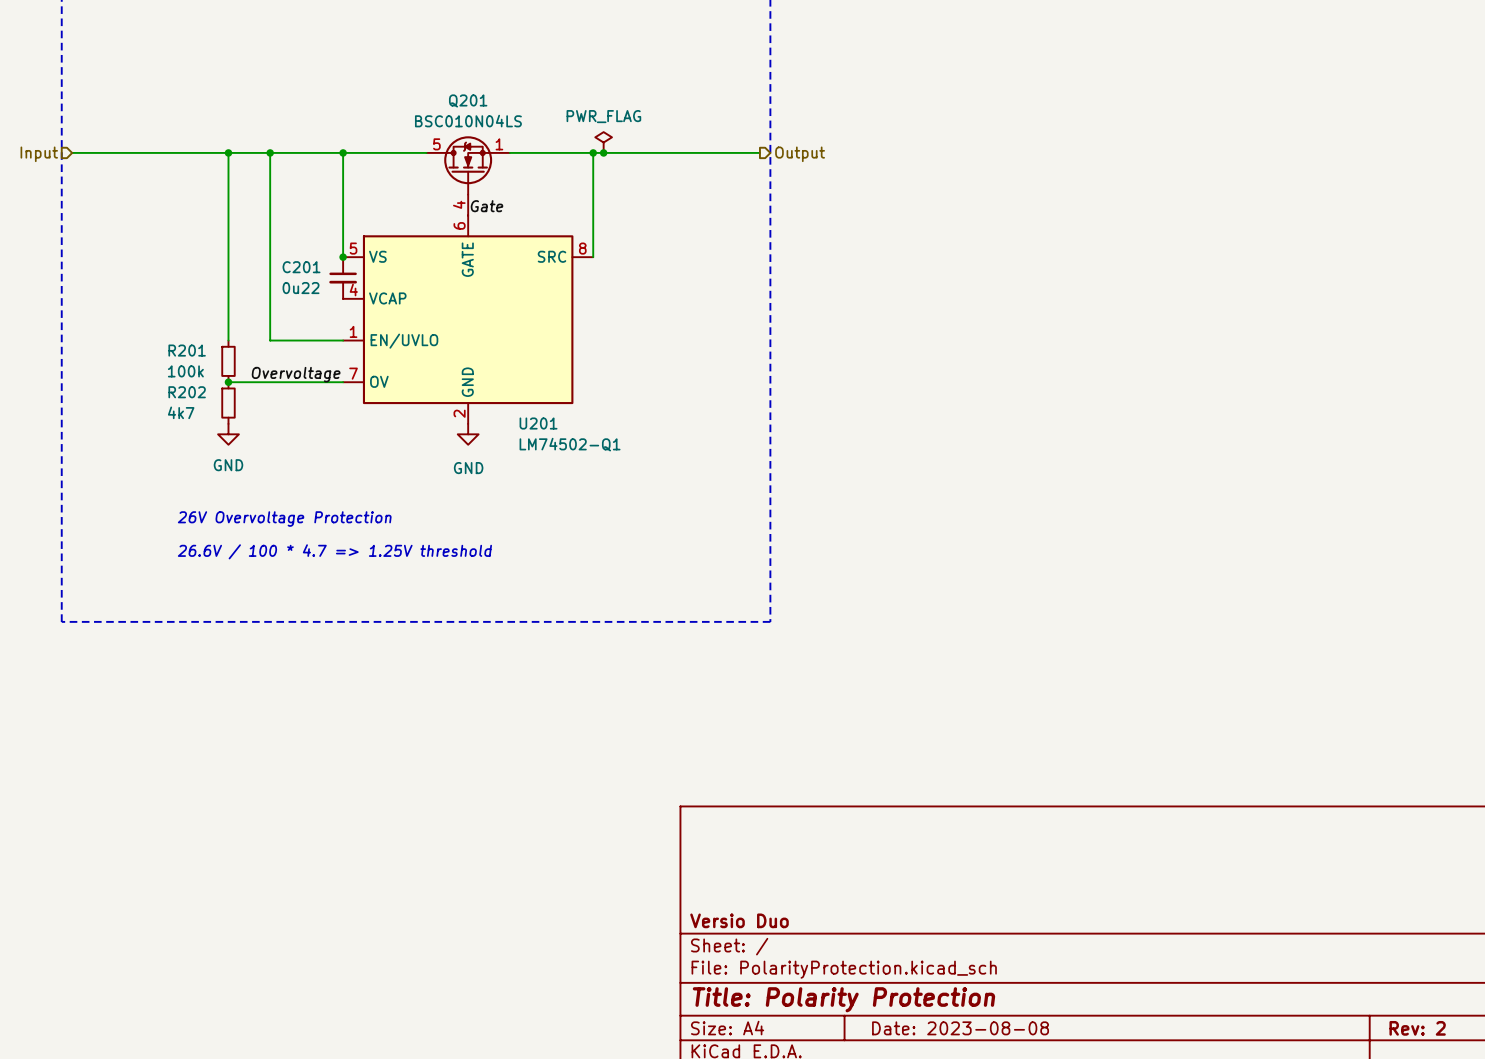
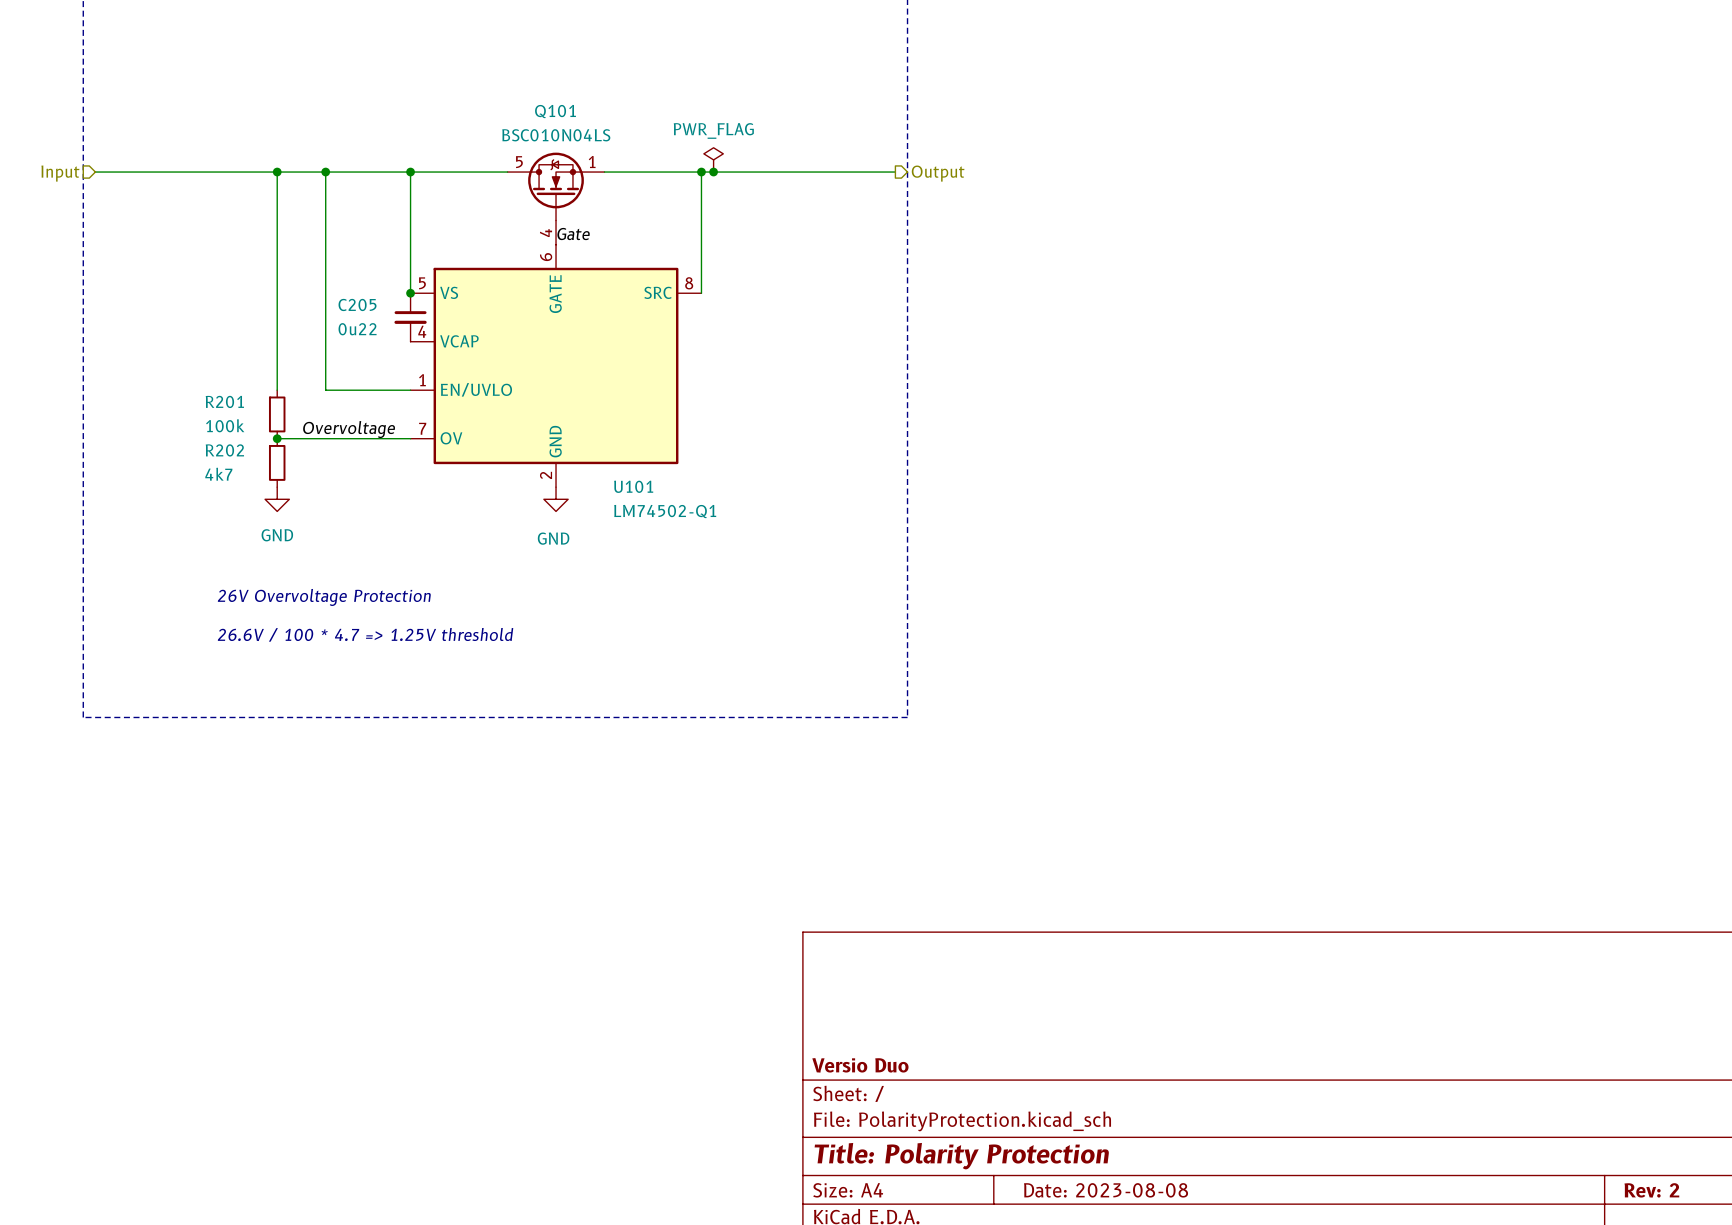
Q201 name: Q201 (468, 100) -> Q101 (555, 111)
C201 name: C201 (301, 267) -> C205 (357, 304)
U201 name: U201 (538, 423) -> U101 (633, 486)

